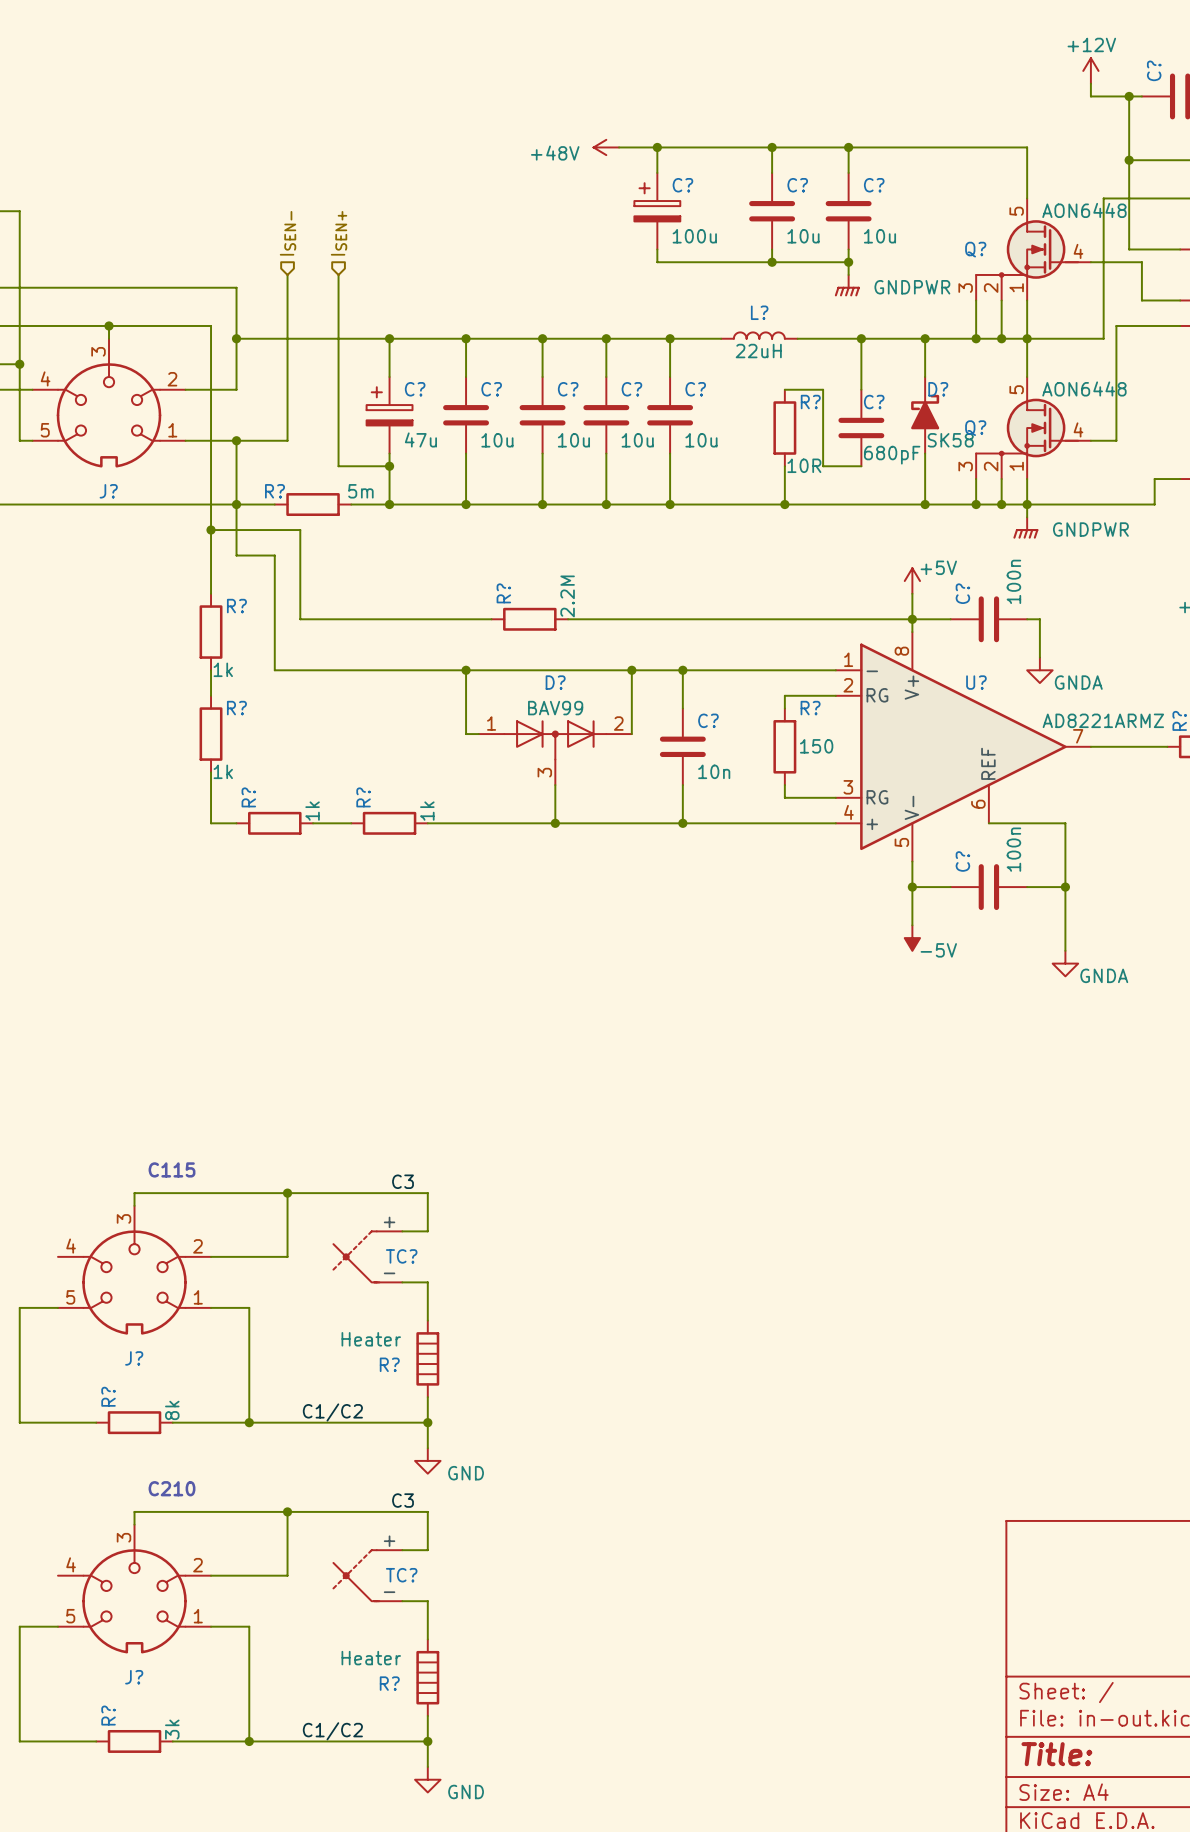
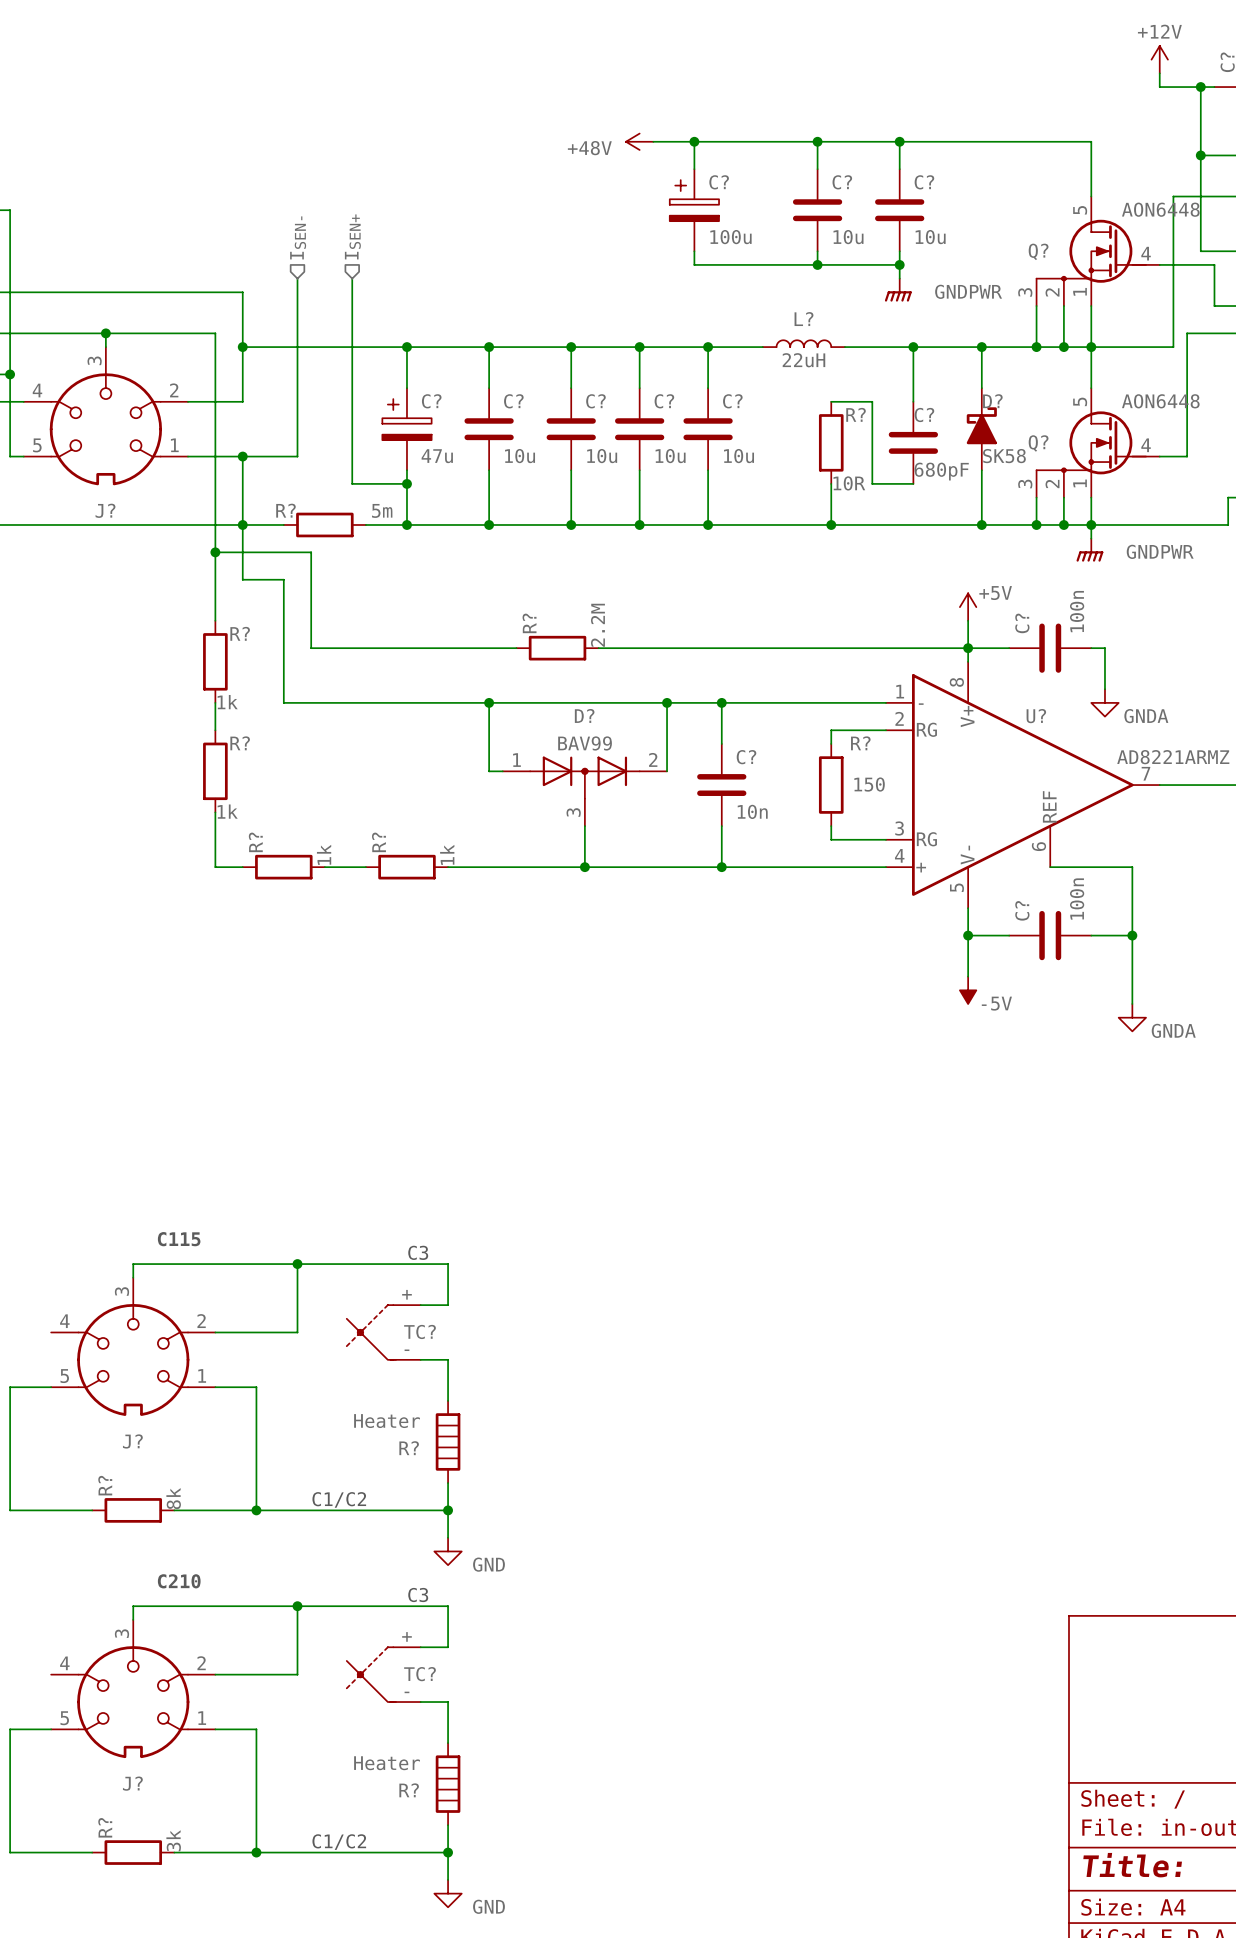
label: C3 (403, 1181) -> none
text: none -> C3 (418, 1252)
label: C1/C2 (332, 1412) -> none
text: none -> C1/C2 (339, 1499)
label: C3 (403, 1500) -> none
text: none -> C3 (418, 1595)
label: C1/C2 (332, 1731) -> none
text: none -> C1/C2 (339, 1842)

